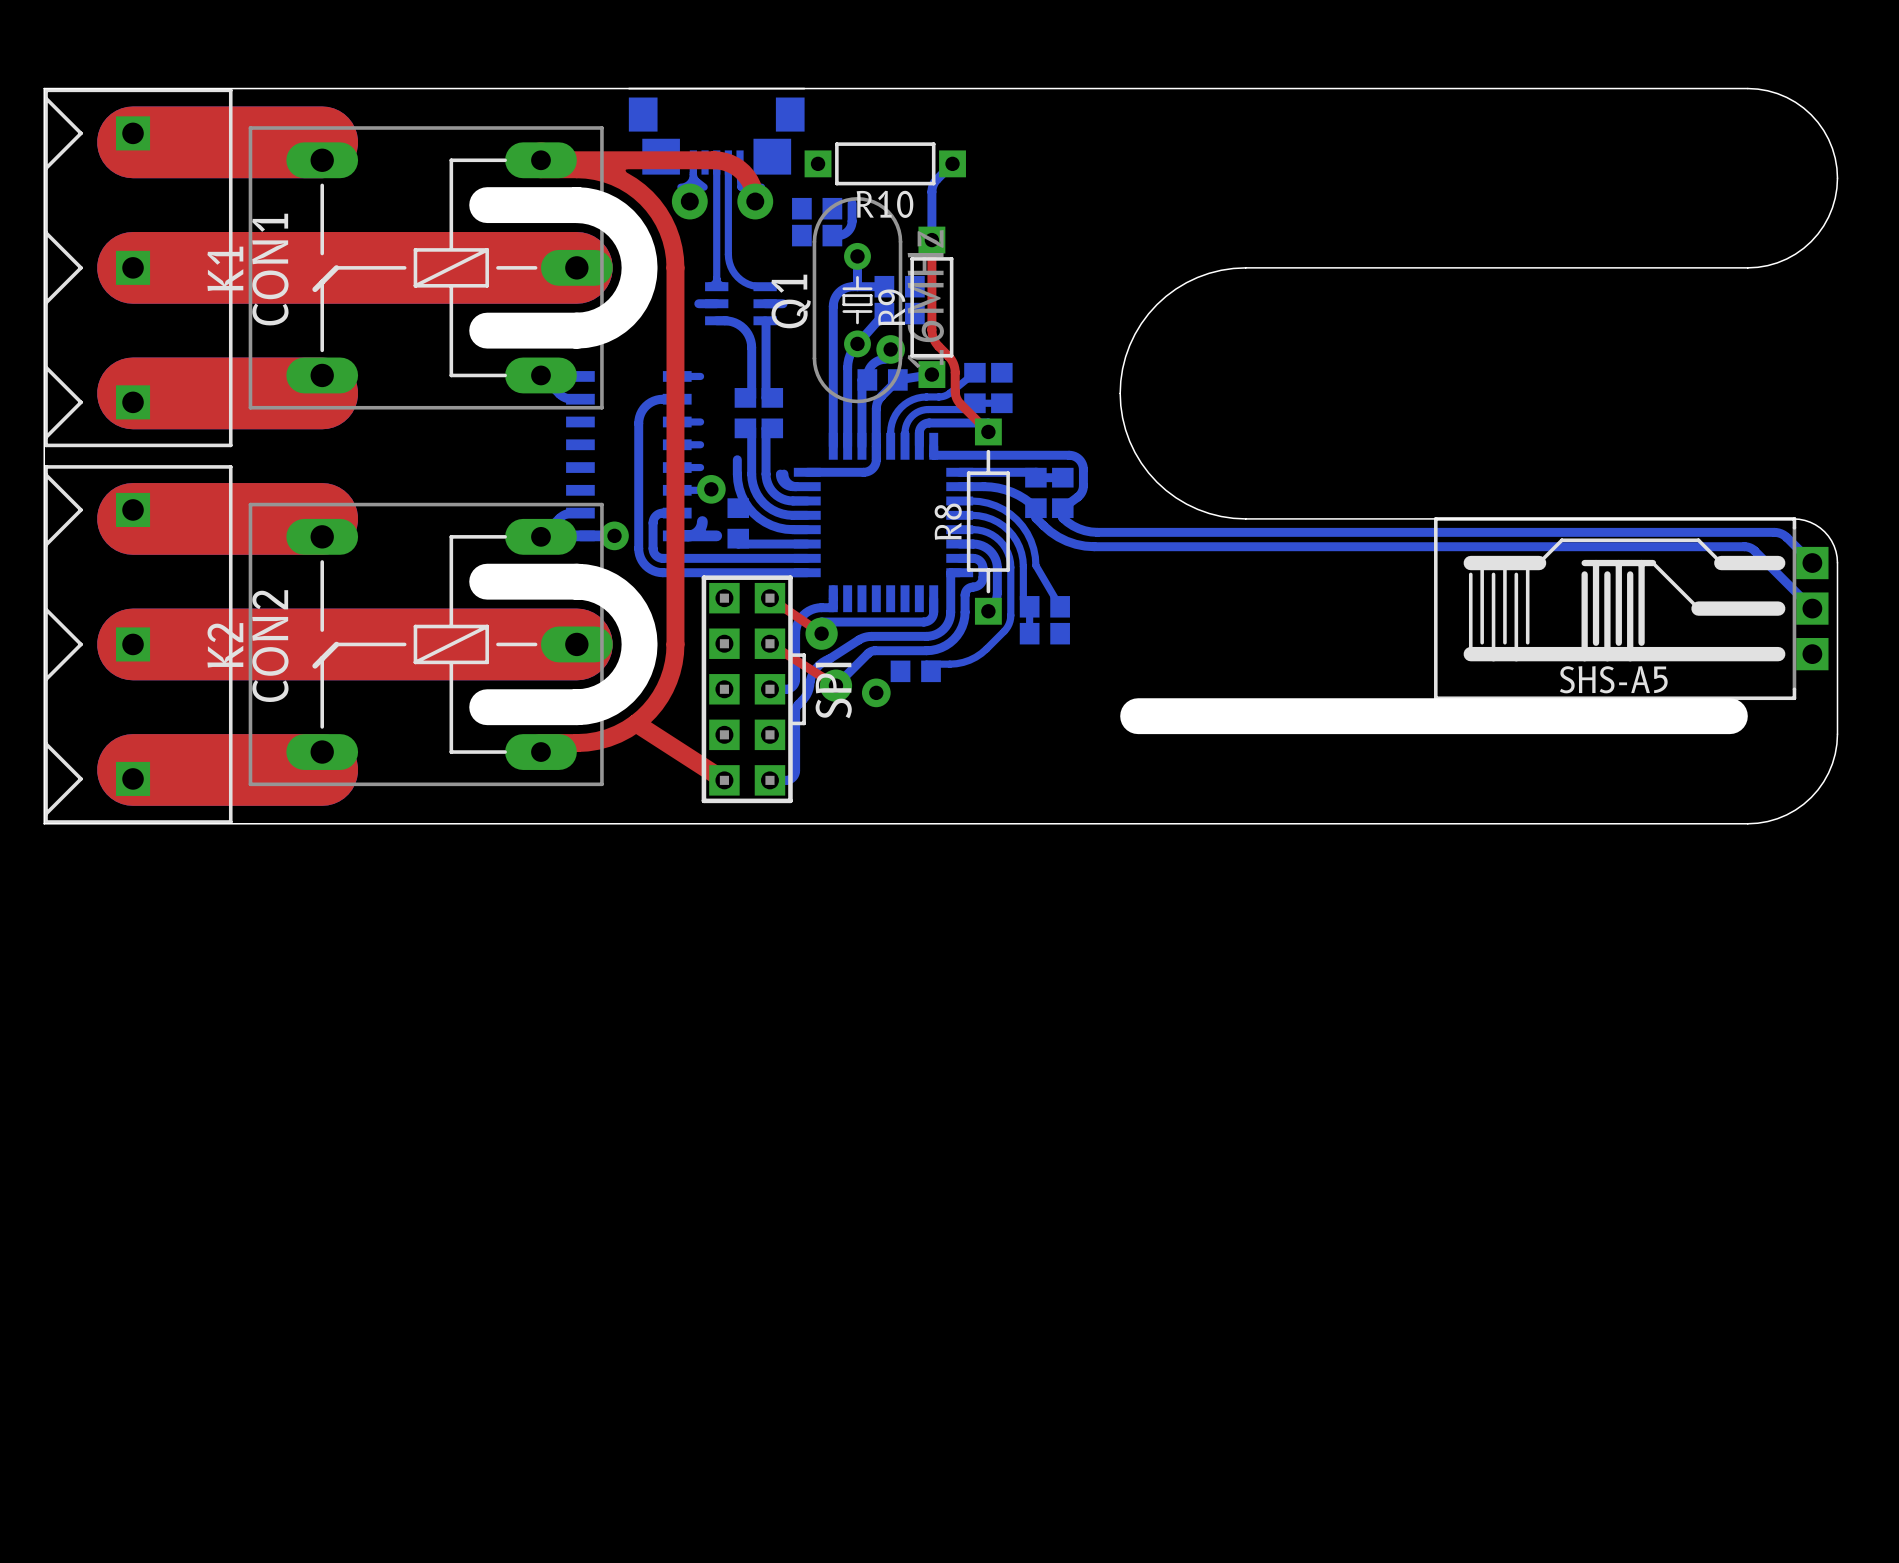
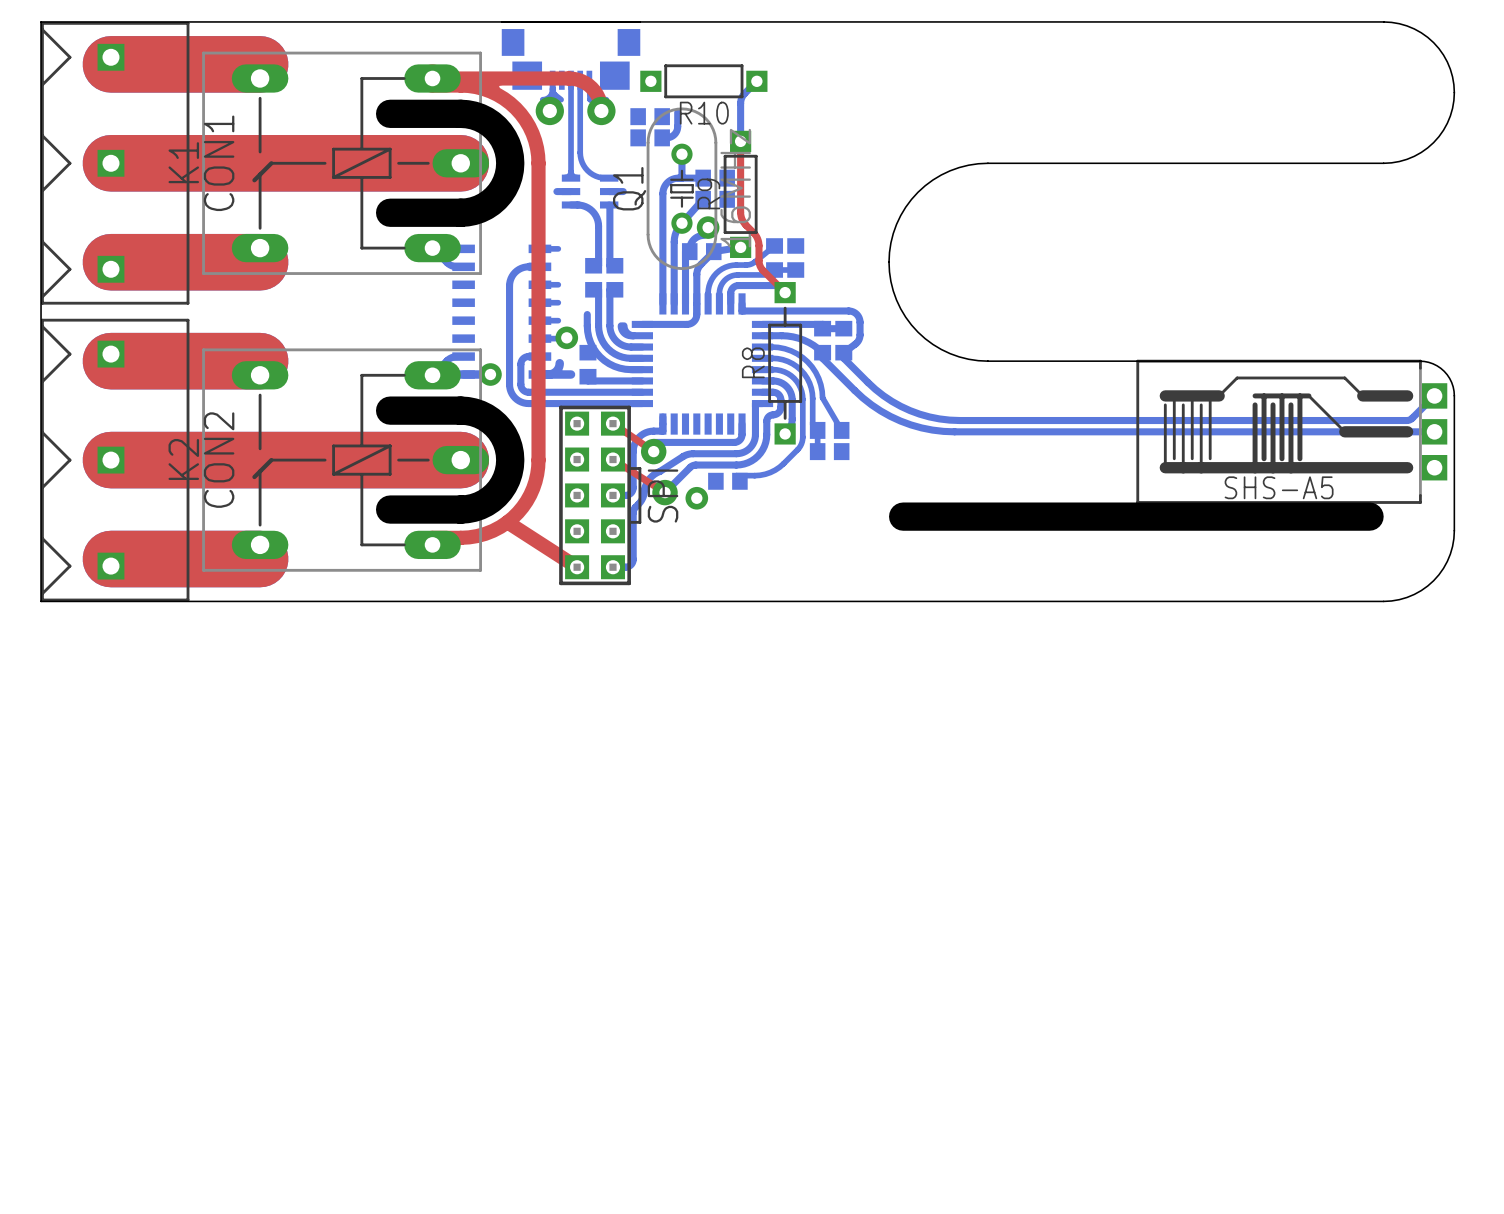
bottom track: (1035, 515) (1035, 518) (1043, 525) (1058, 537) (1075, 544) (1094, 546) (1745, 546) (1754, 550) (1812, 608) -> (822, 358) (862, 397) (880, 411) (900, 421) (932, 430) (954, 431) (1434, 431)
bottom track: (1062, 515) (1062, 518) (1067, 522) (1078, 528) (1097, 532) (1774, 532) (1785, 536) (1812, 563) -> (843, 358) (875, 389) (891, 401) (919, 414) (949, 420) (1406, 420) (1412, 418) (1434, 395)

